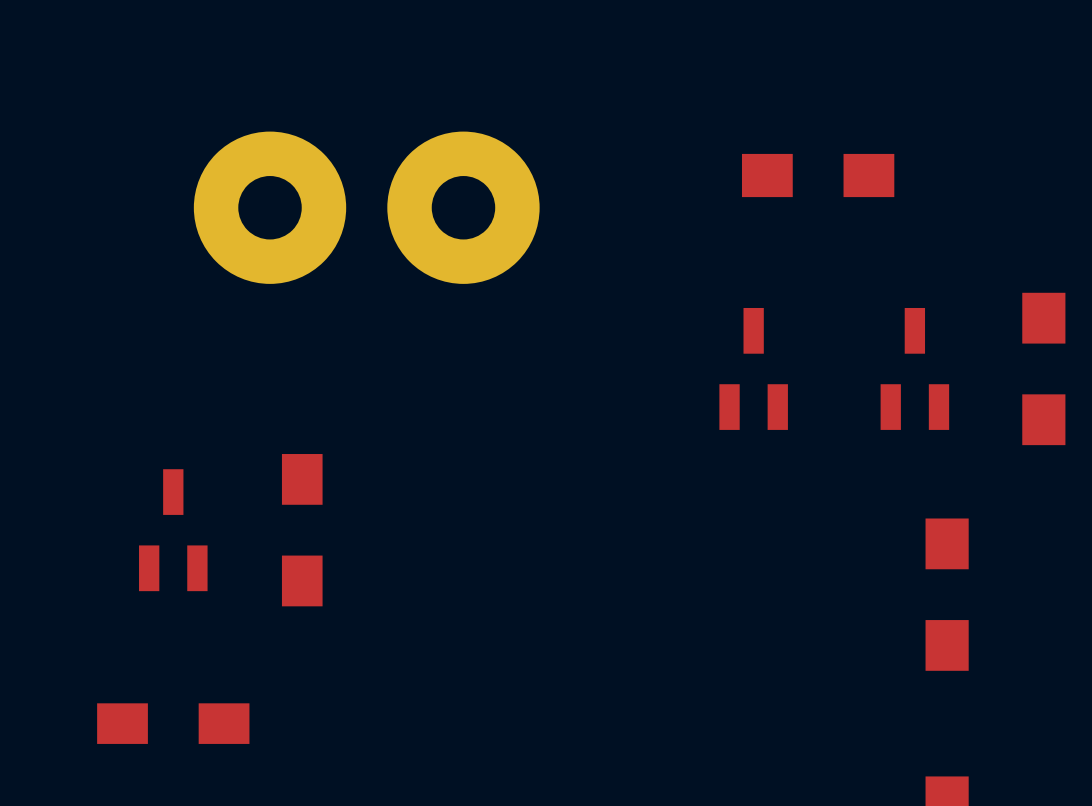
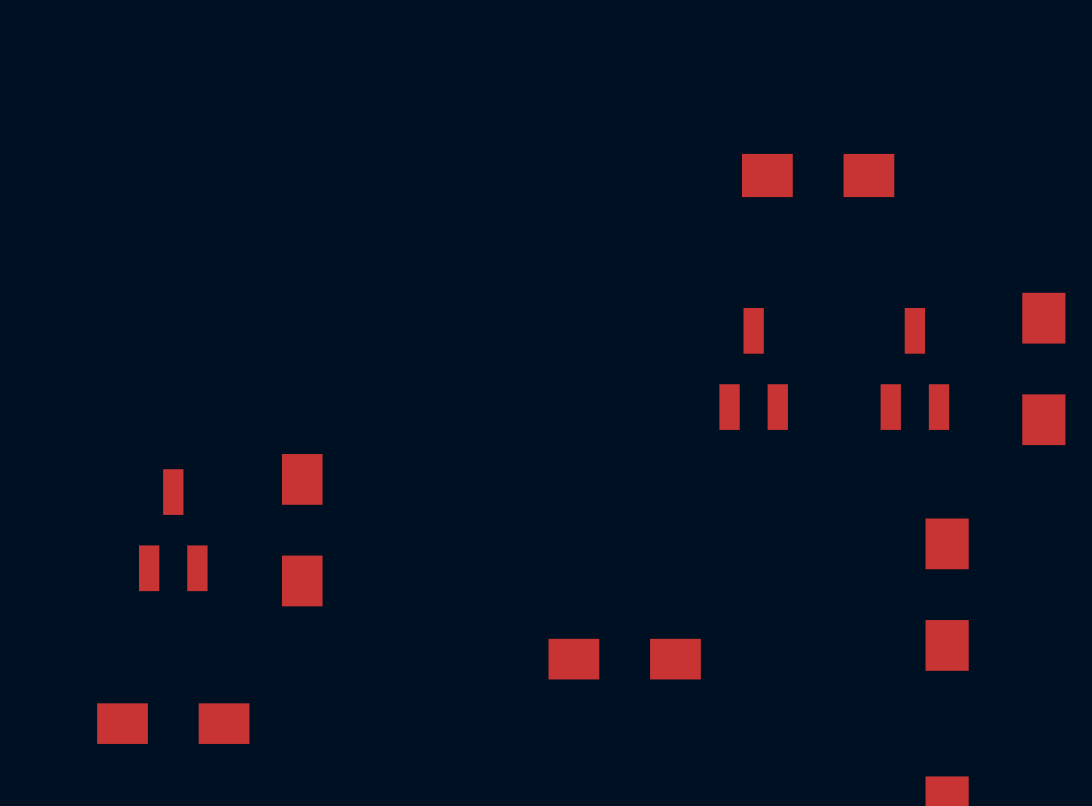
part: (366, 207) -> none
part: none -> (624, 659)

